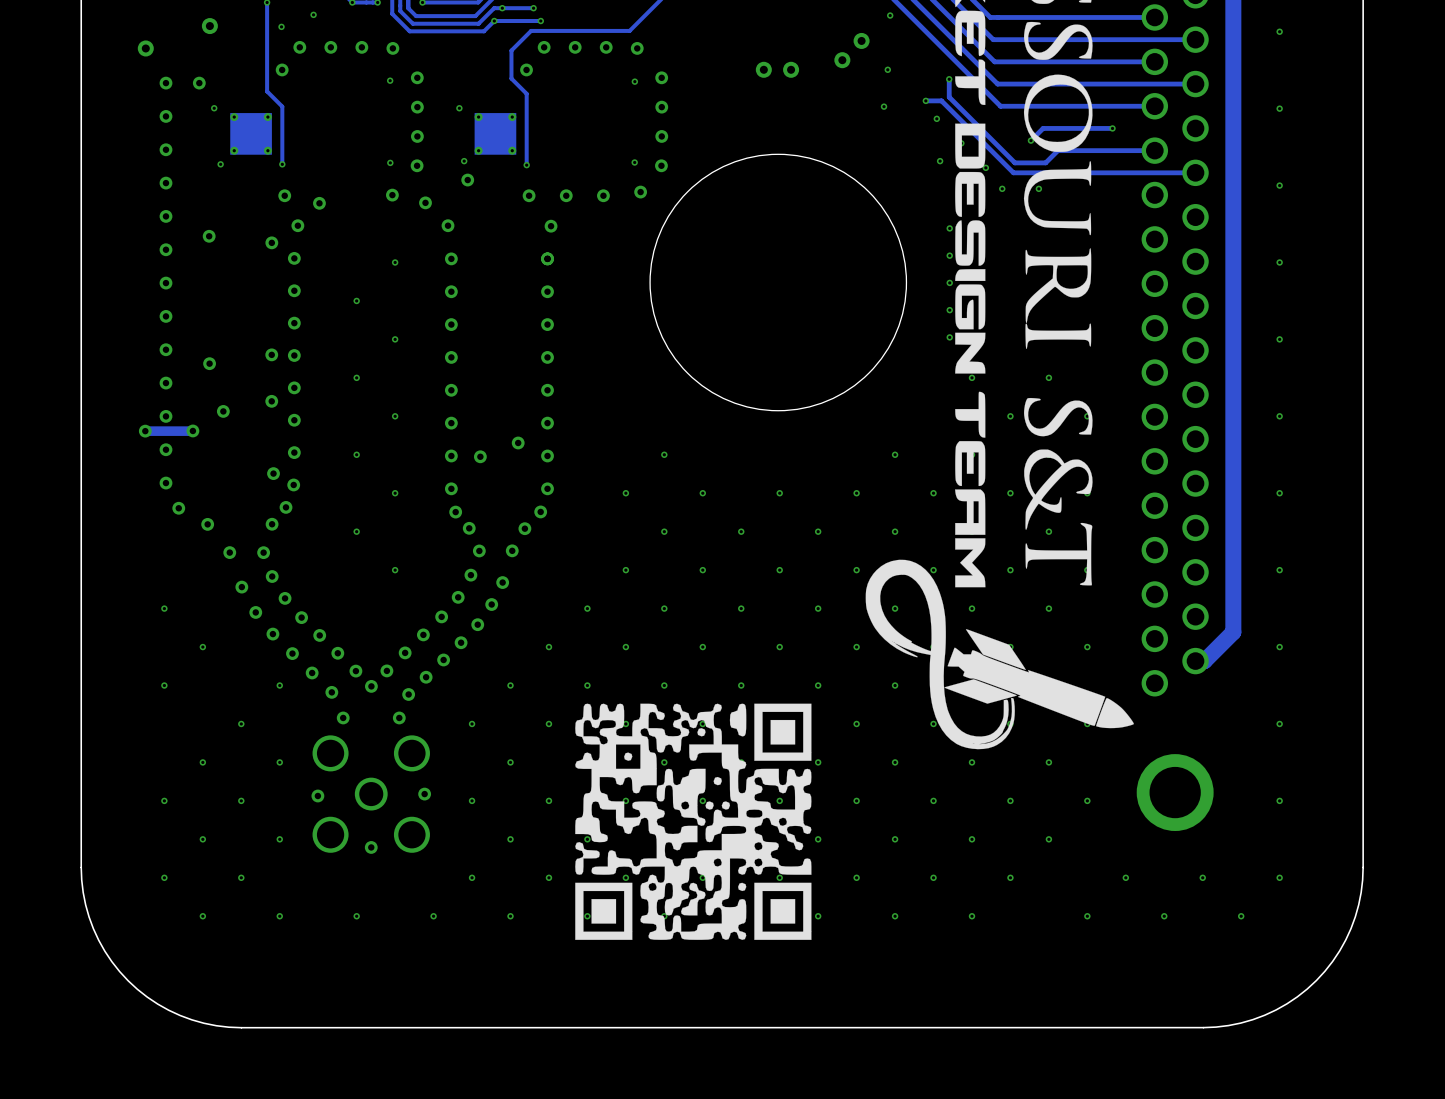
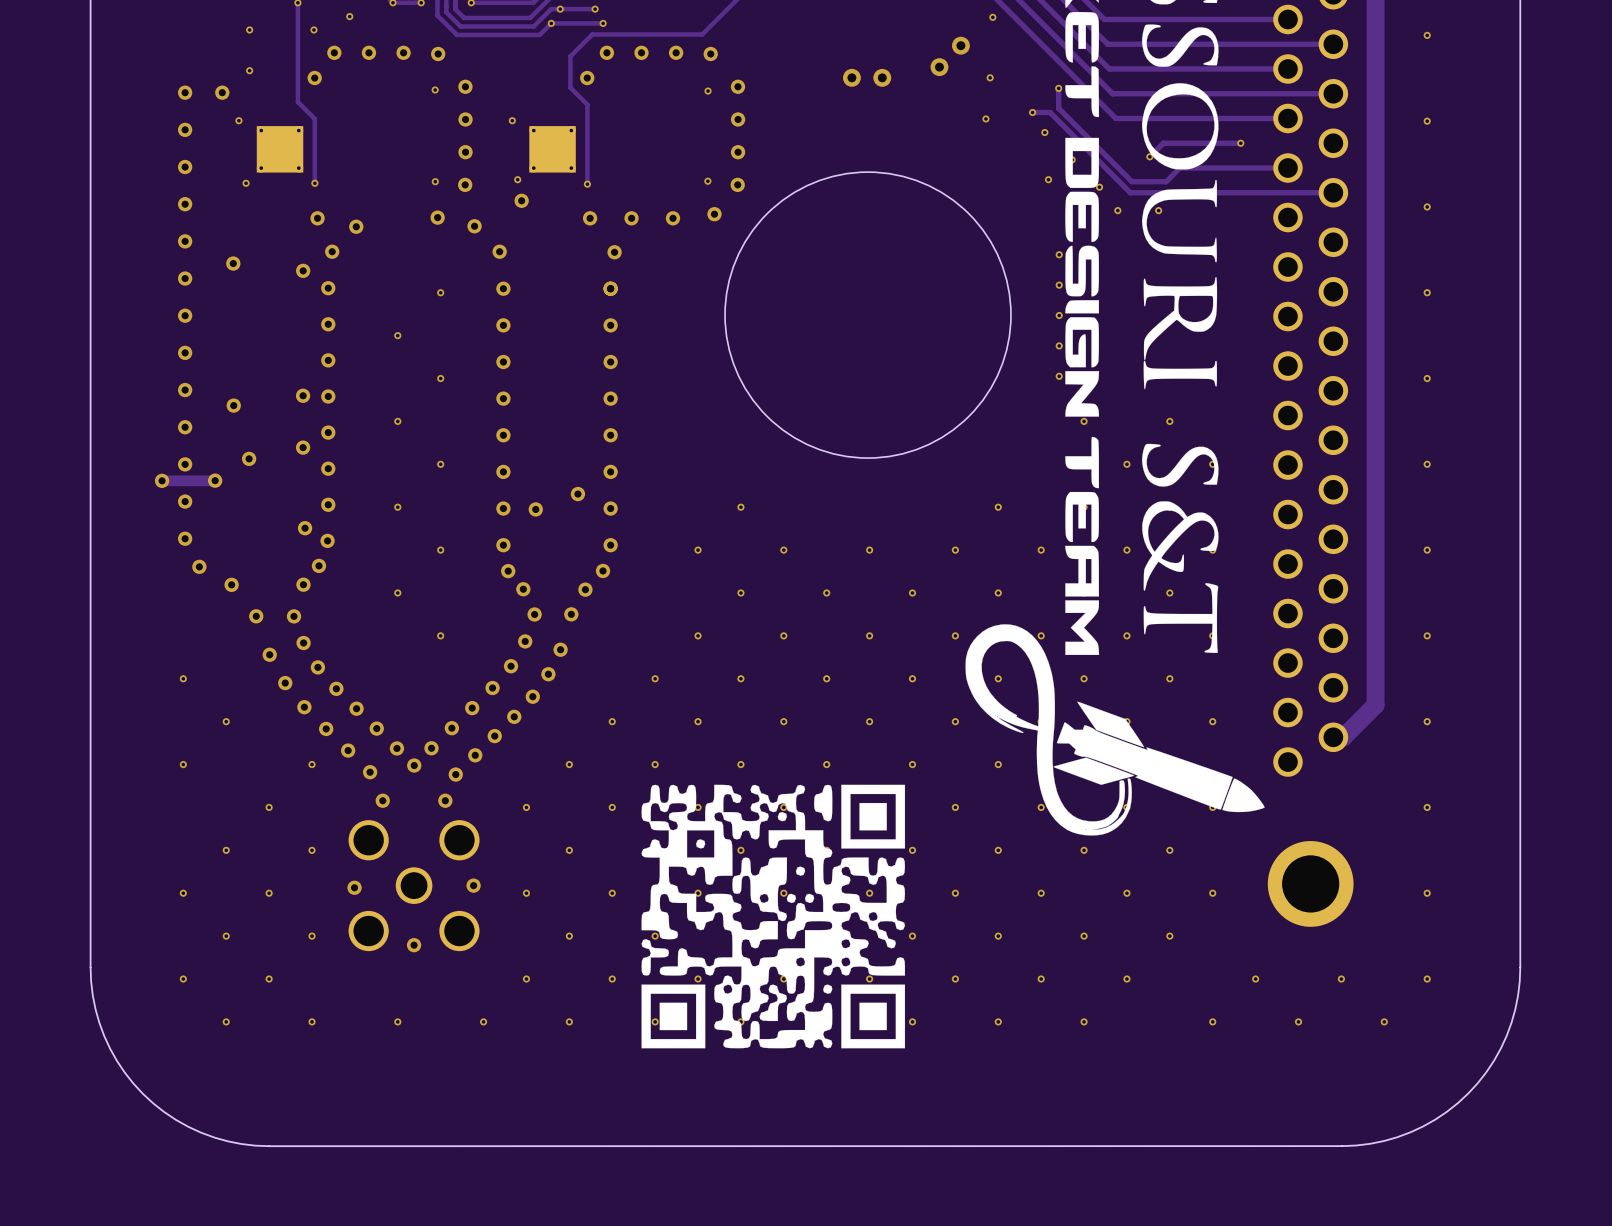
via: (209, 26) -> none
via: none -> (249, 29)
via: (145, 48) -> none
via: none -> (249, 70)

